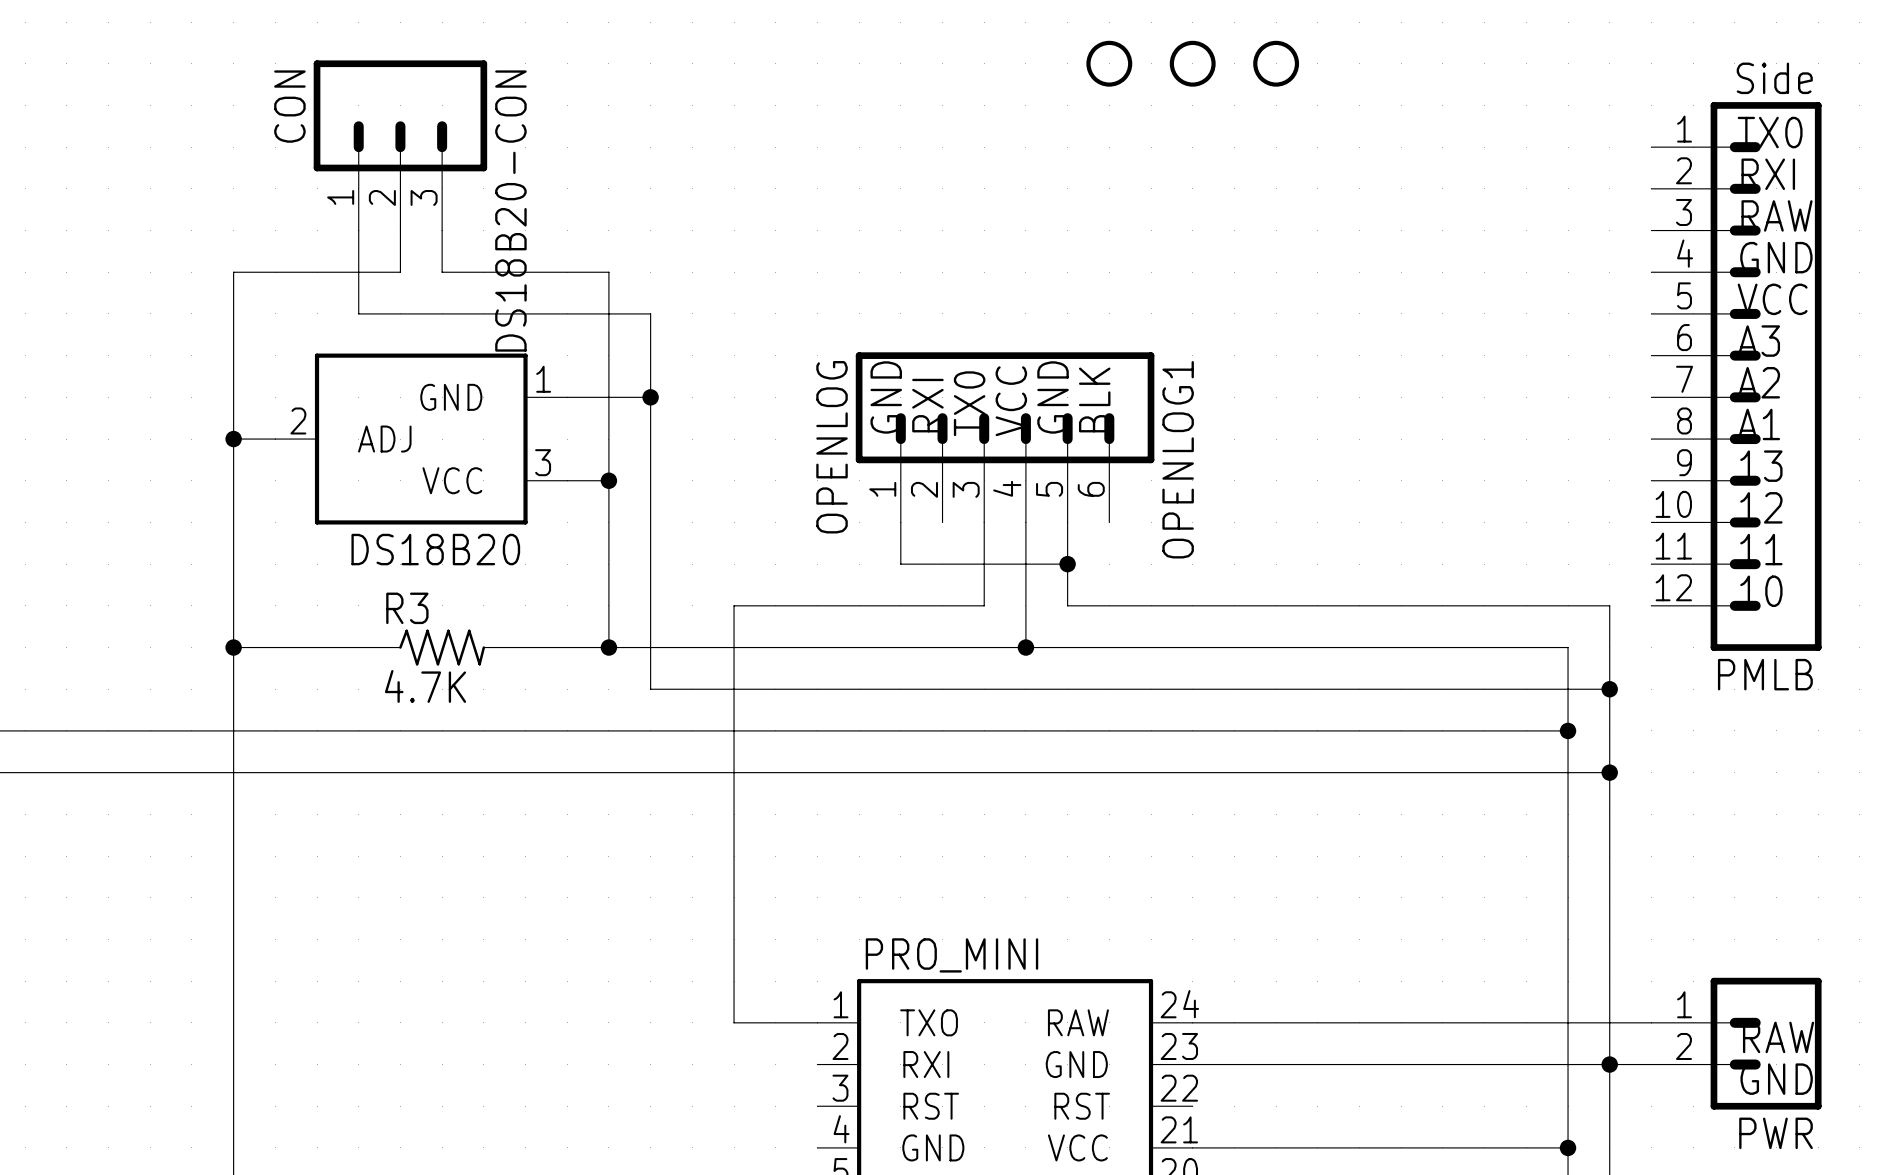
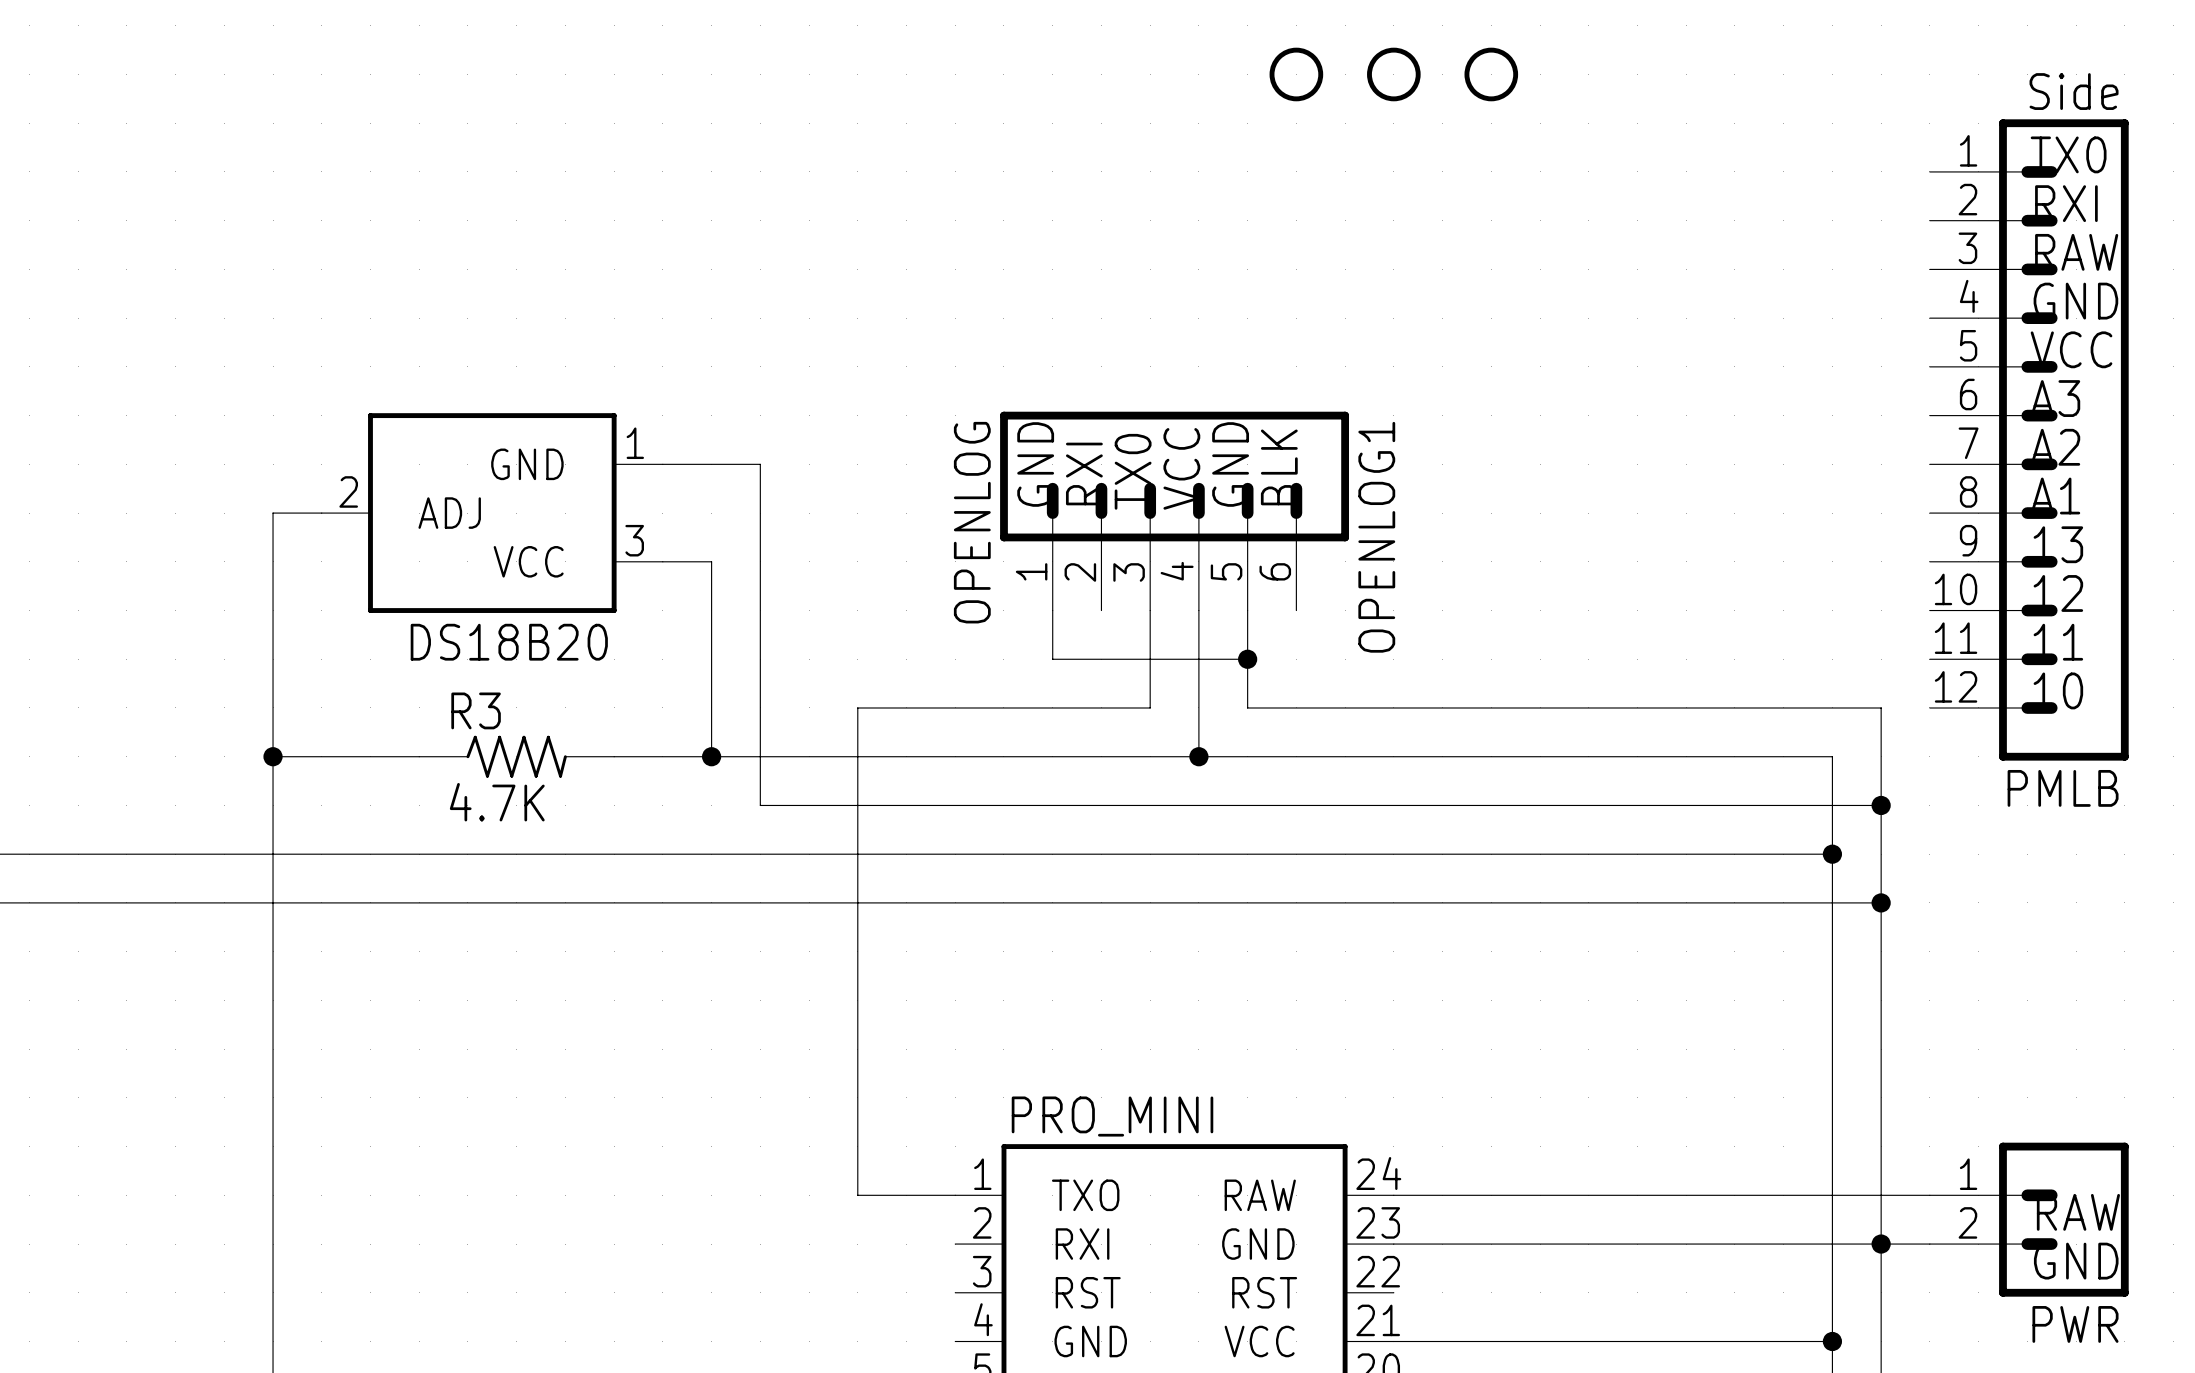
DS18B20-CON: CON (400, 145) -> none
wire: (358, 230) (358, 313) (650, 313) (650, 397) -> none
wire: (400, 230) (400, 272) (233, 272) (233, 439) -> none
wire: (442, 230) (442, 272) (608, 272) (608, 480) -> none
junction: (650, 397) -> none
junction: (233, 439) -> none
junction: (608, 480) -> none

